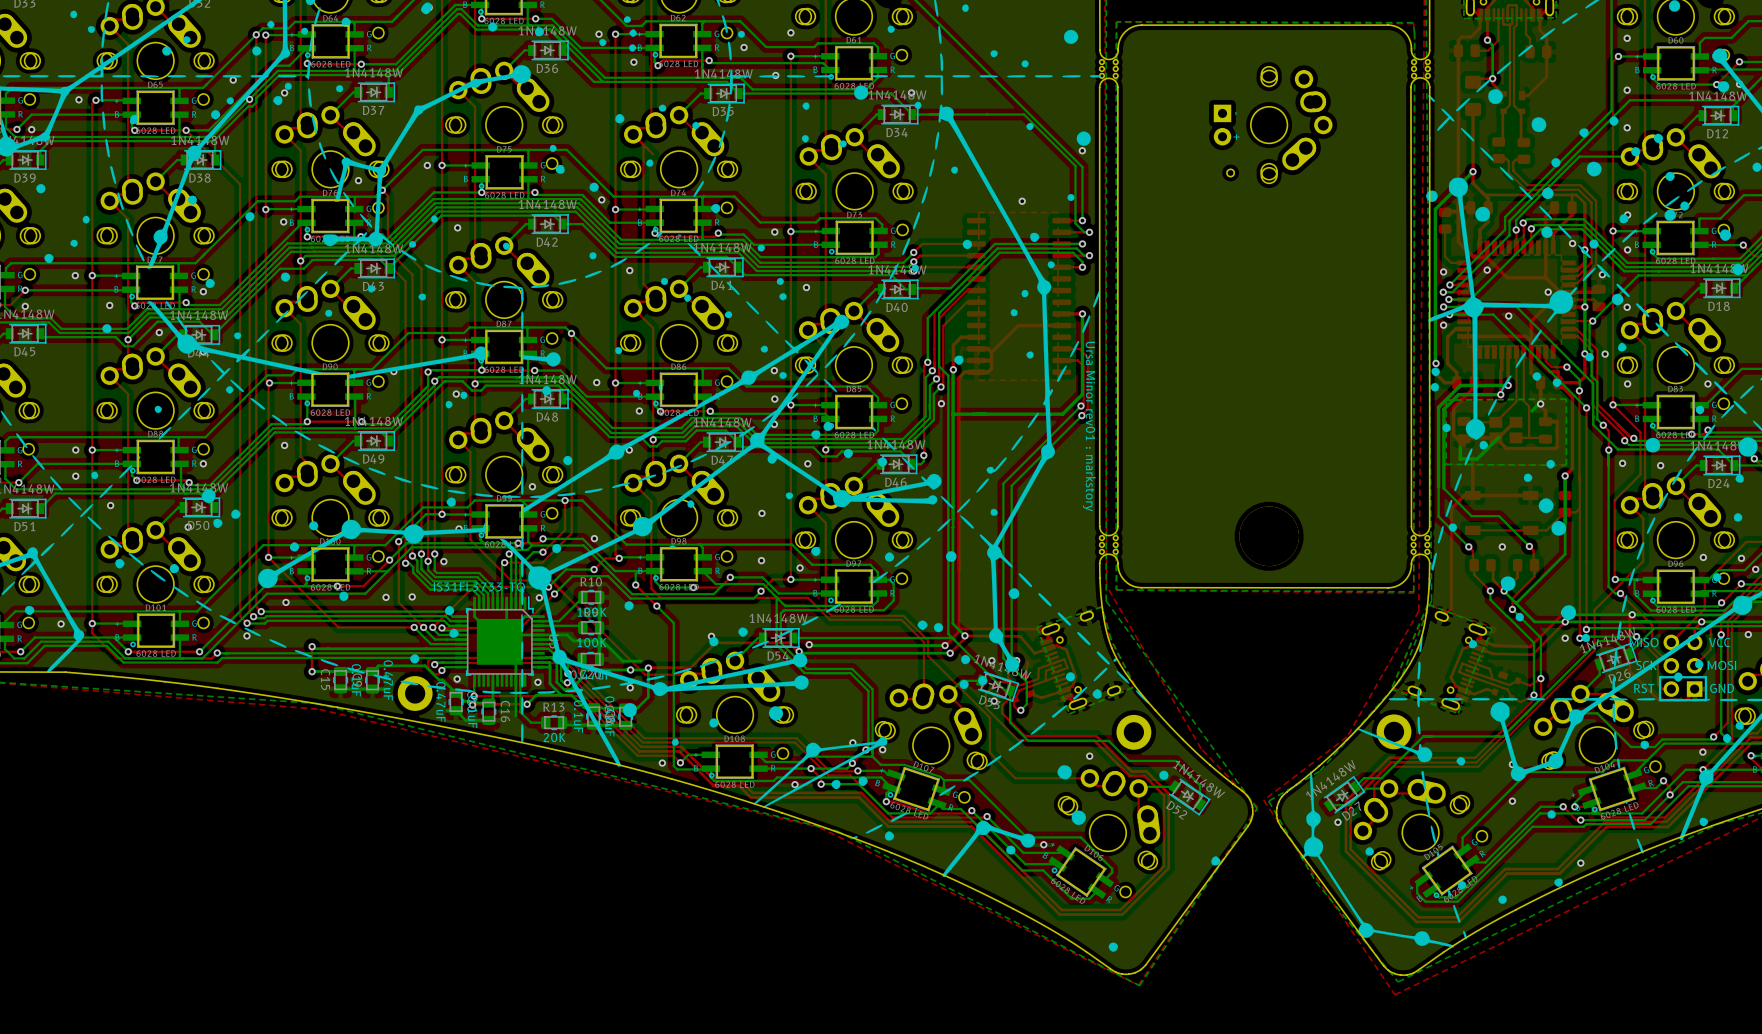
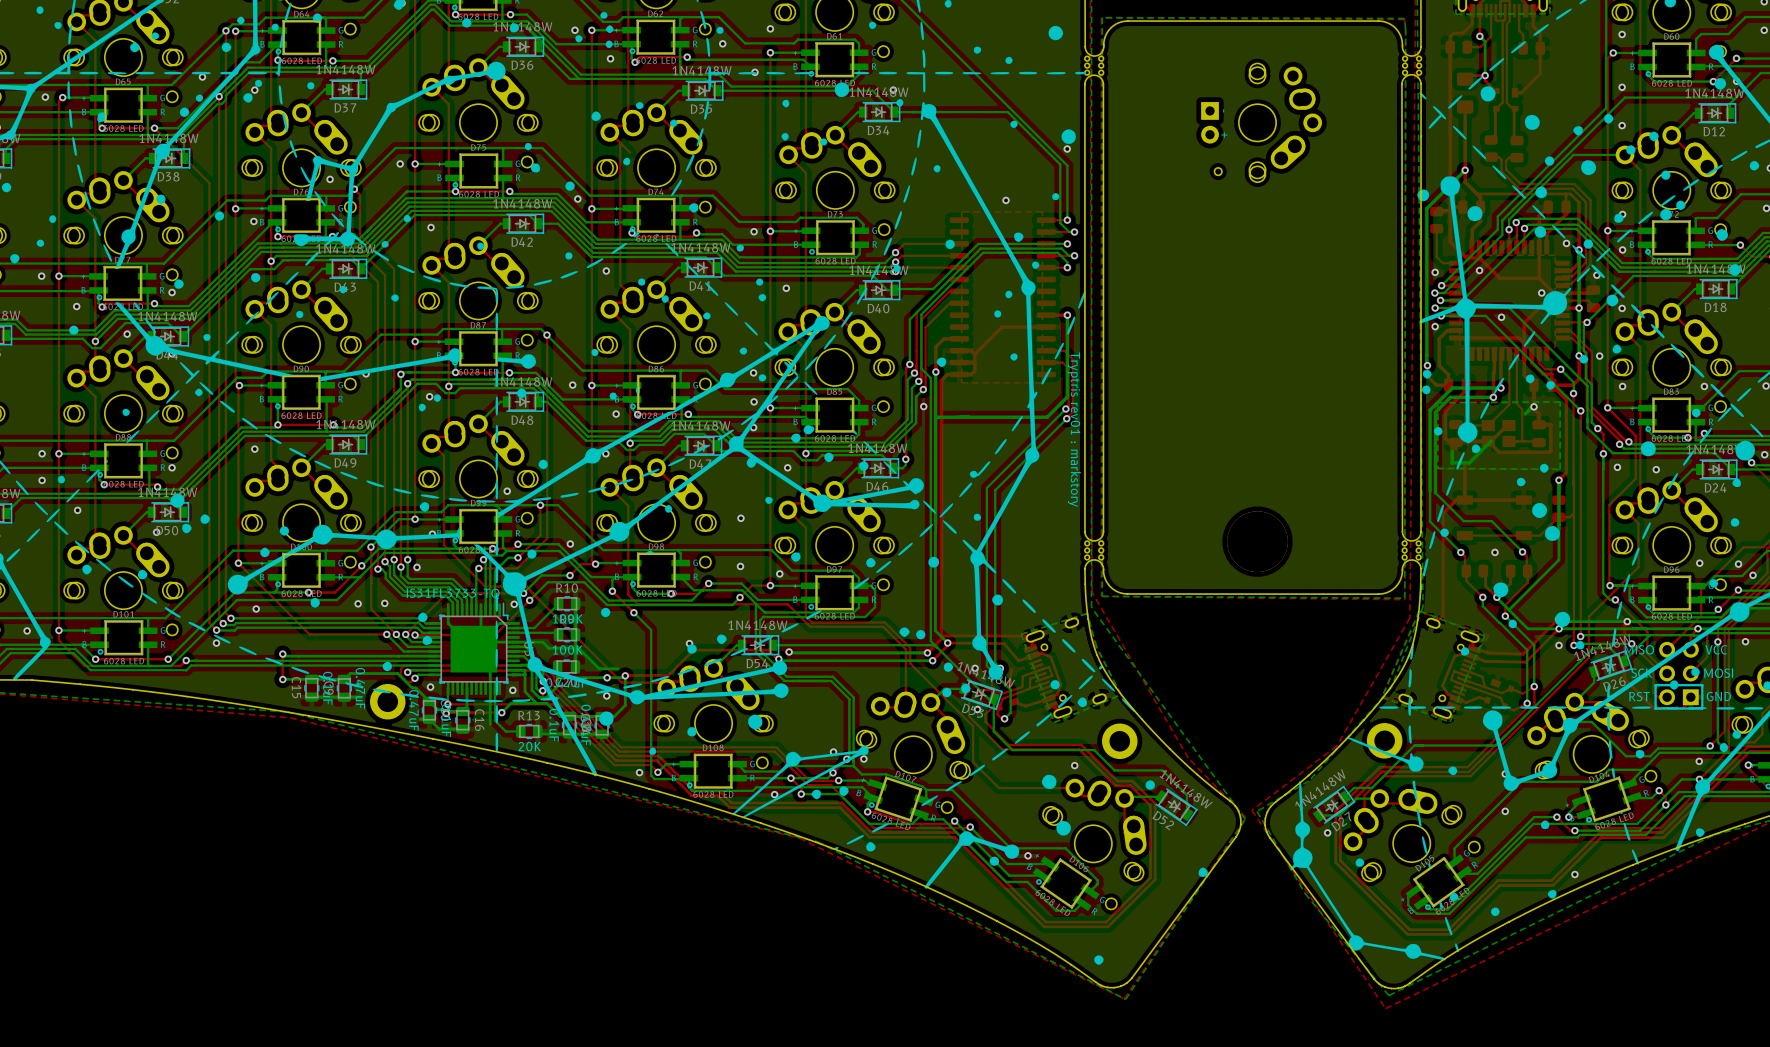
text: Ursa Minor rev01 : markstory (1089, 426) -> Tryptris rev01 : markstory (1074, 429)

